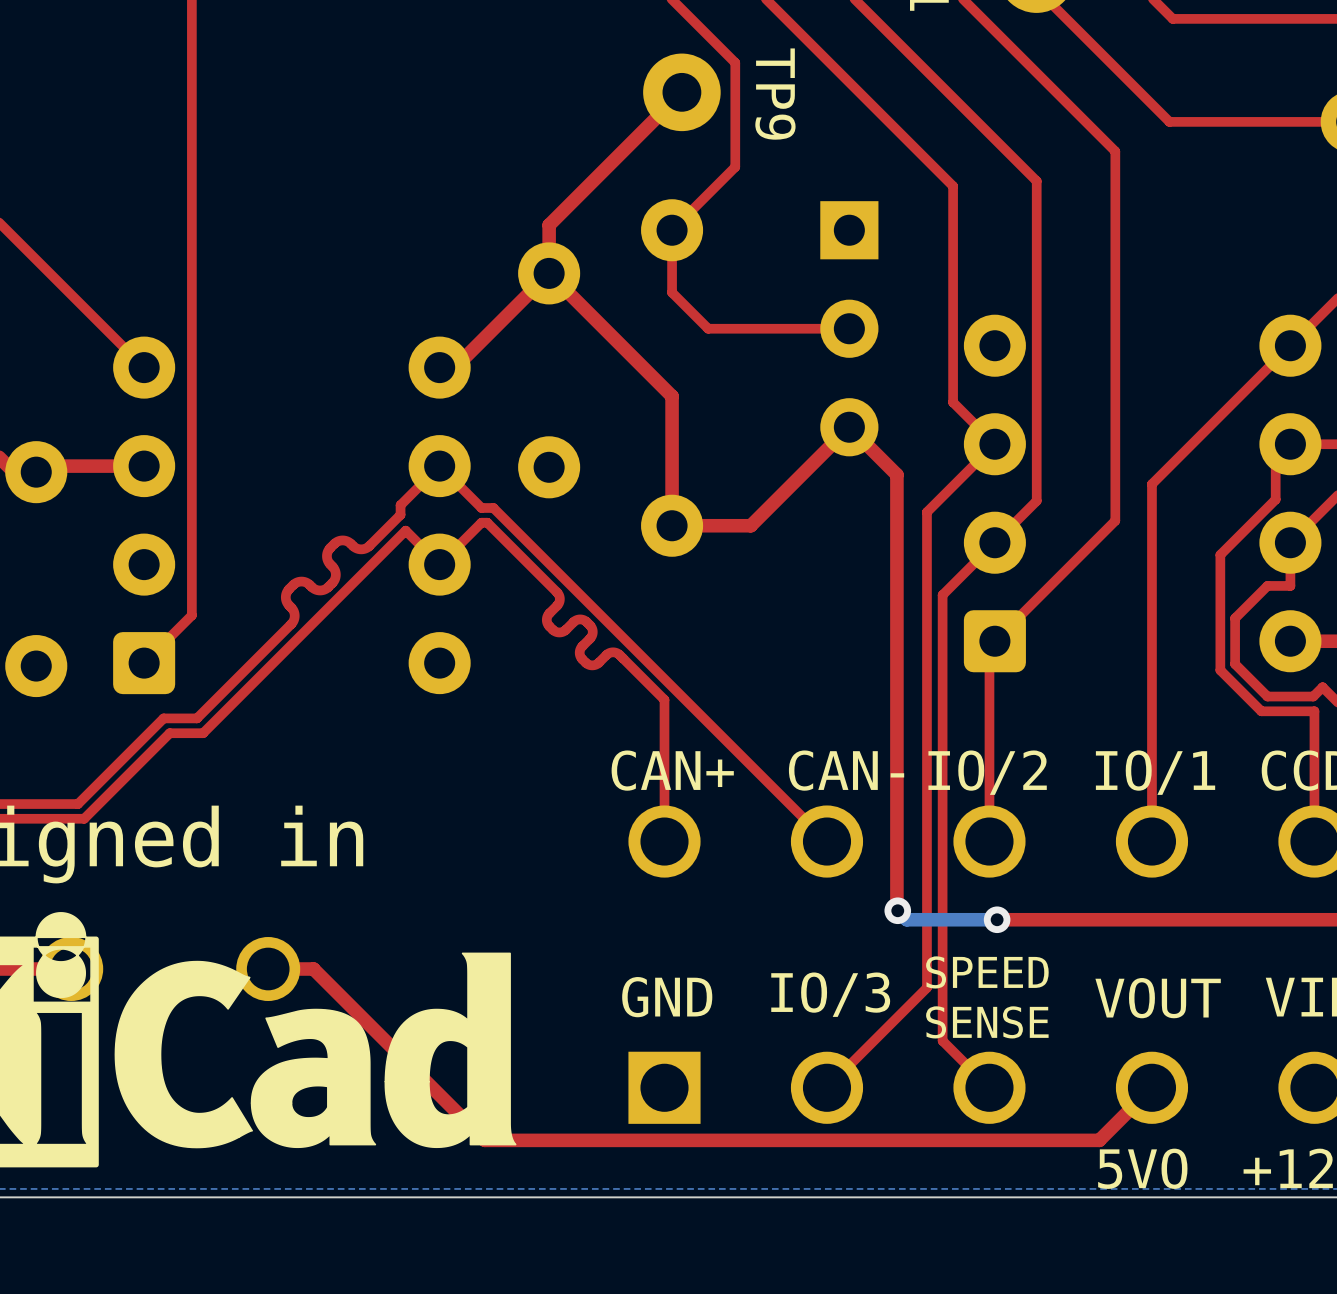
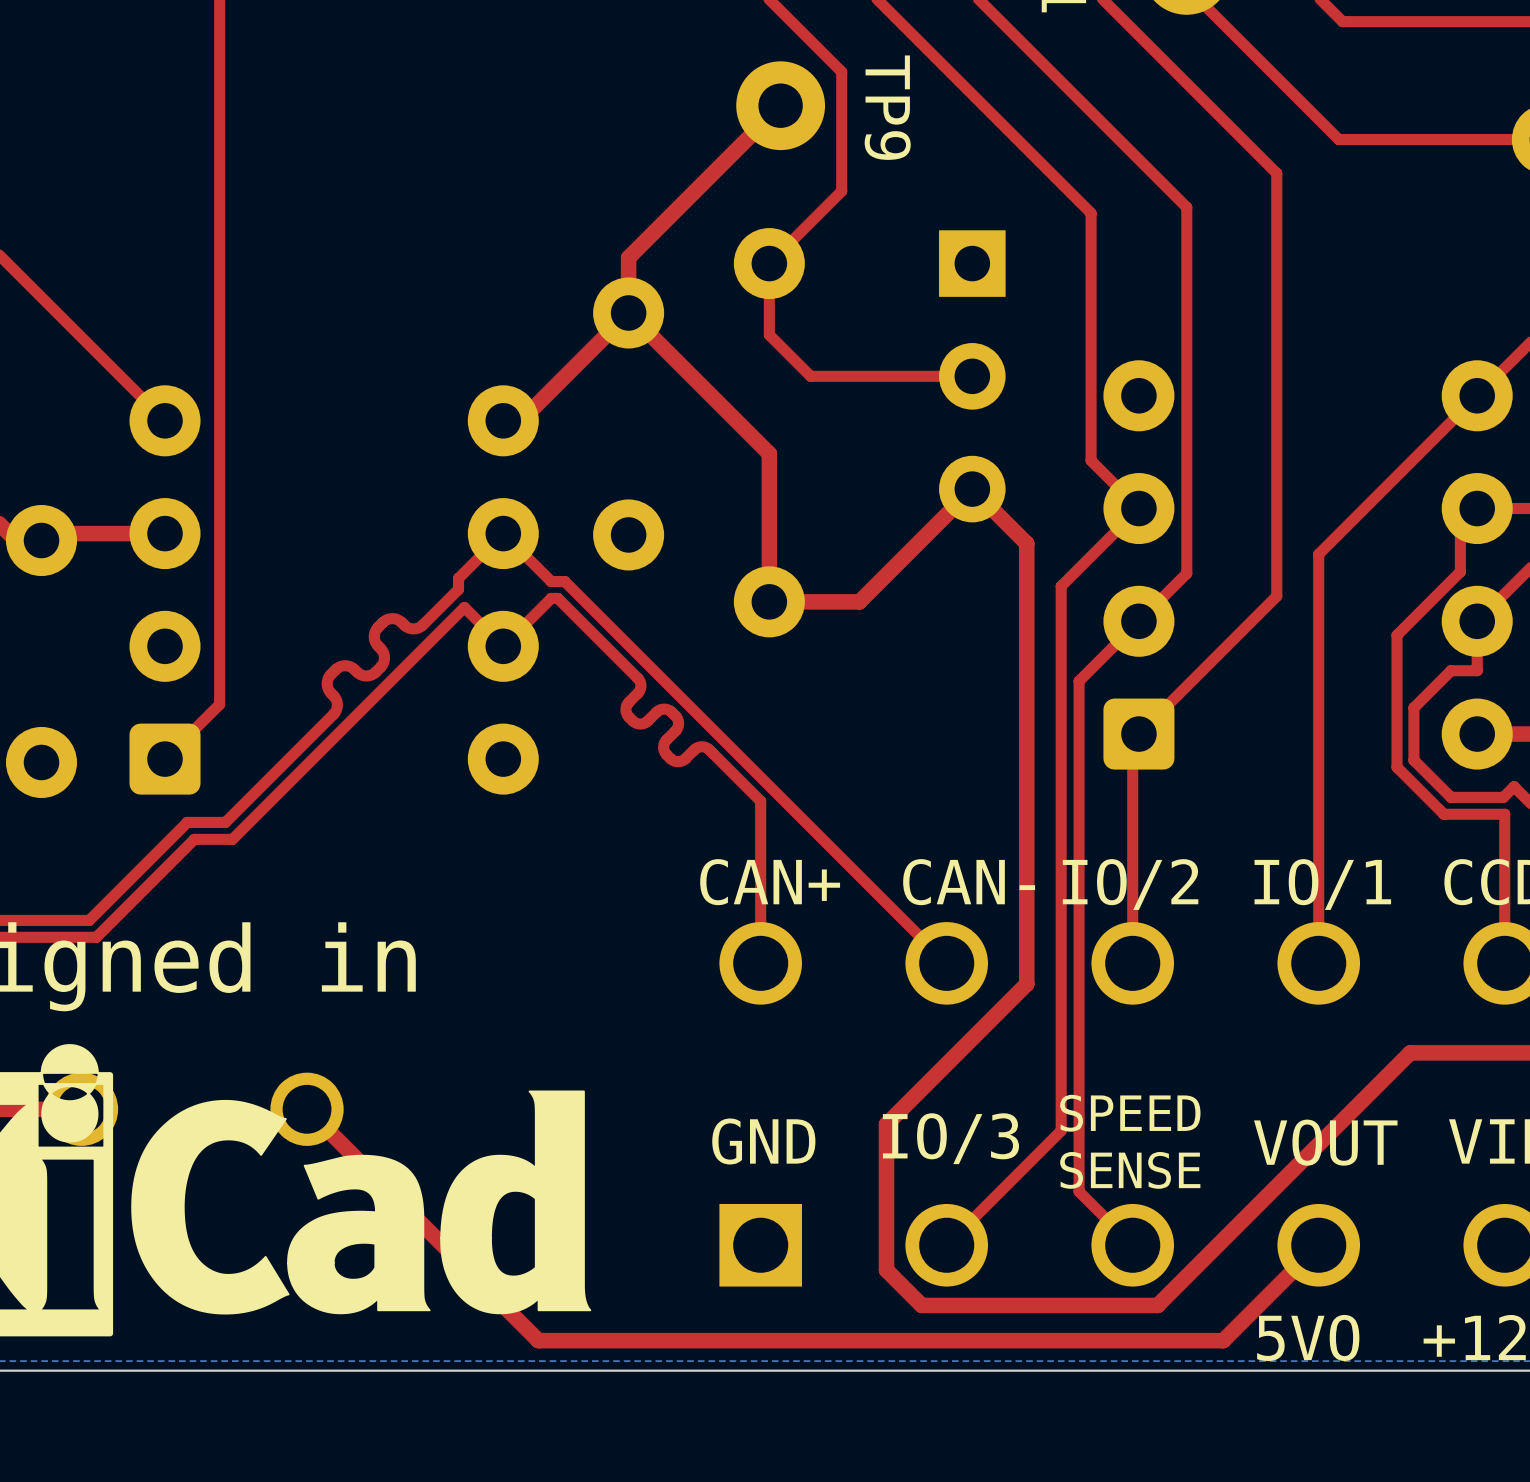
top track: (896, 859) (896, 909) -> (1026, 984) (886, 1124) (886, 1270) (921, 1305)
bottom track: (896, 909) (906, 919) (997, 919) -> none
via: (897, 910) -> none
via: (997, 919) -> none
top track: (1231, 919) (997, 919) -> (1410, 1052) (1157, 1305)
top track: (268, 969) (313, 969) (484, 1140) (805, 1140) -> (307, 1109) (538, 1340) (1223, 1340) (1258, 1305)
top track: (1099, 1140) (1011, 1140) -> none

